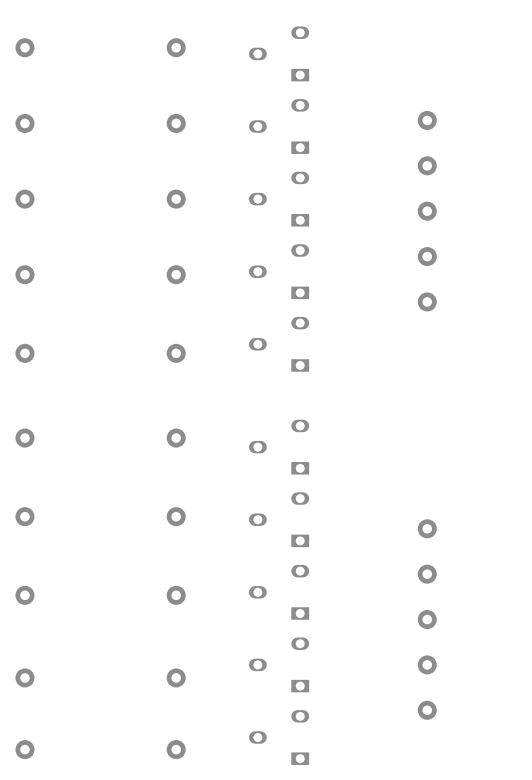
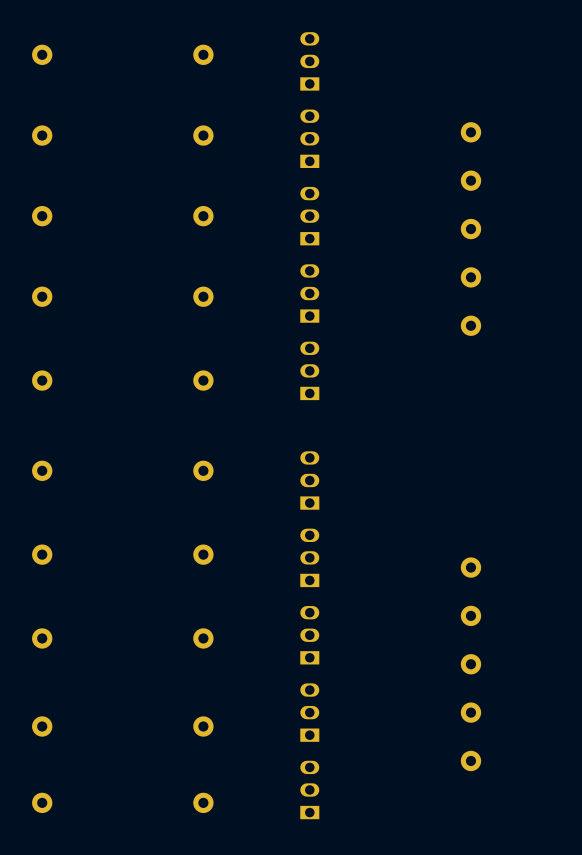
part footprint: [248, 26, 310, 82] -> [300, 32, 320, 91]
part footprint: [248, 99, 310, 154] -> [300, 109, 320, 169]
part footprint: [248, 171, 310, 227] -> [300, 186, 320, 246]
part footprint: [248, 244, 310, 300] -> [300, 264, 320, 323]
part footprint: [248, 316, 310, 372] -> [300, 341, 320, 401]
part footprint: [248, 419, 310, 475] -> [300, 451, 320, 510]
part footprint: [248, 492, 310, 548] -> [300, 528, 320, 588]
part footprint: [248, 564, 310, 620] -> [300, 606, 320, 665]
part footprint: [248, 637, 310, 693] -> [300, 683, 320, 742]
part footprint: [248, 710, 310, 765] -> [300, 760, 320, 820]

